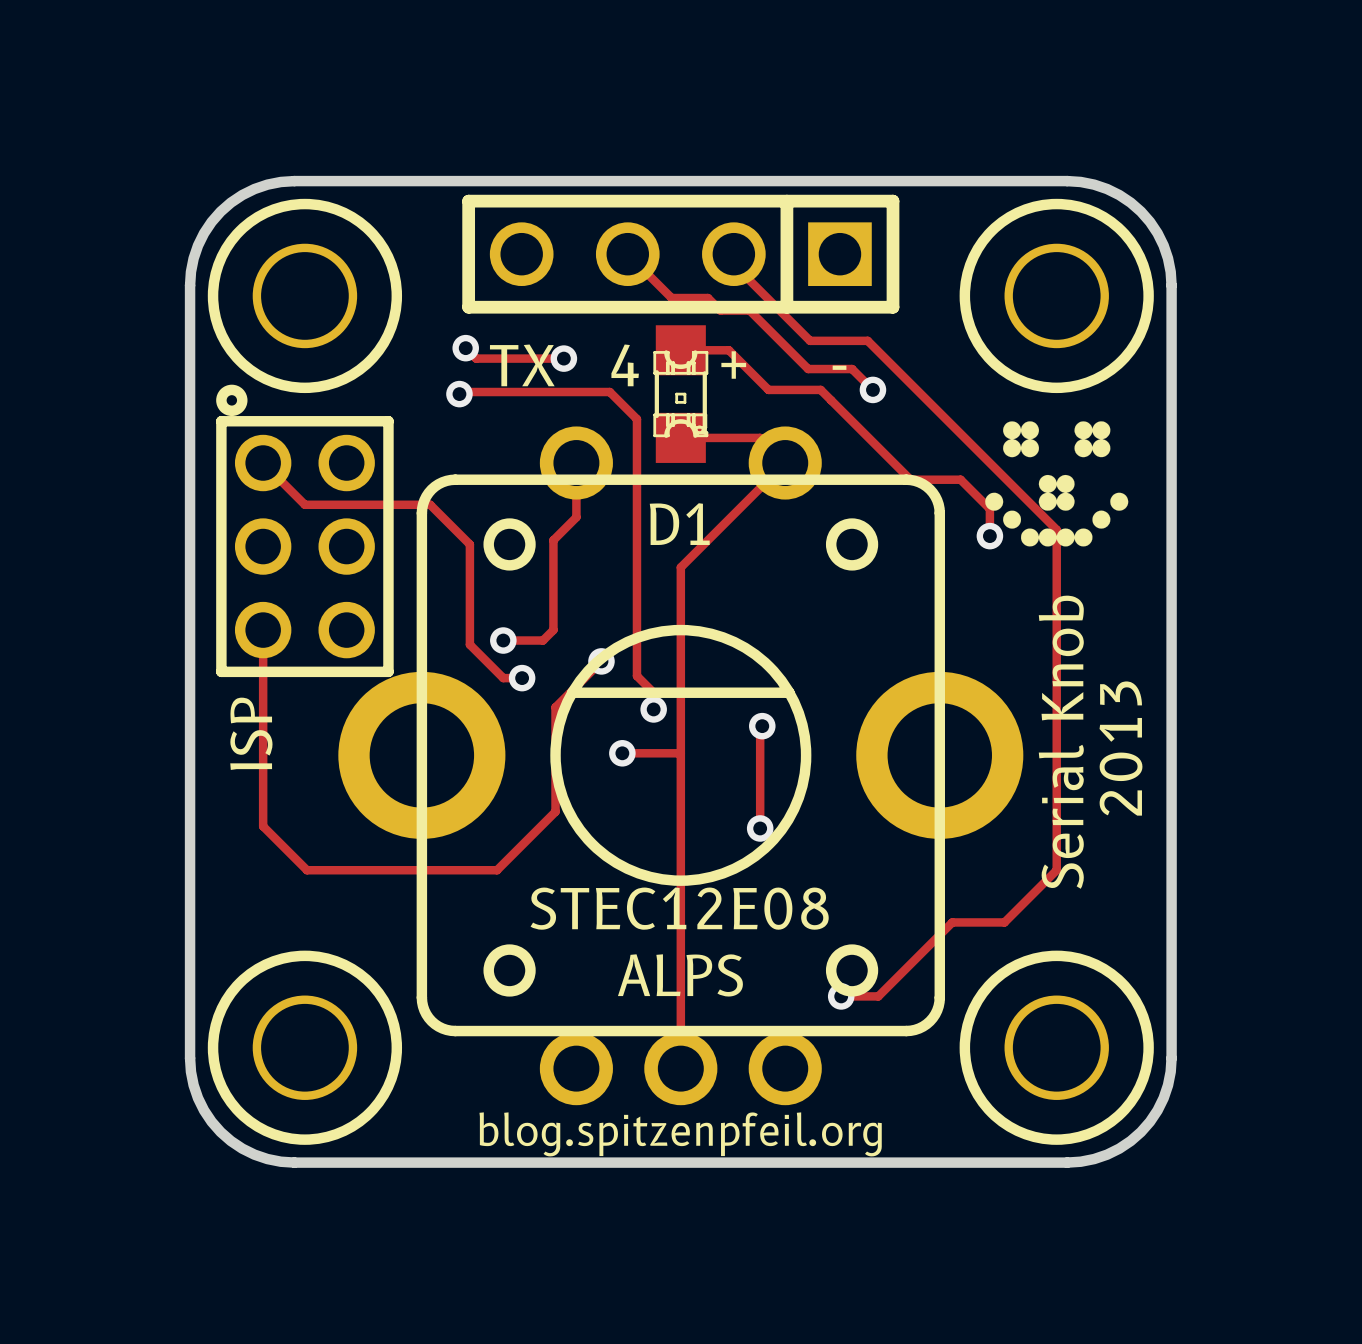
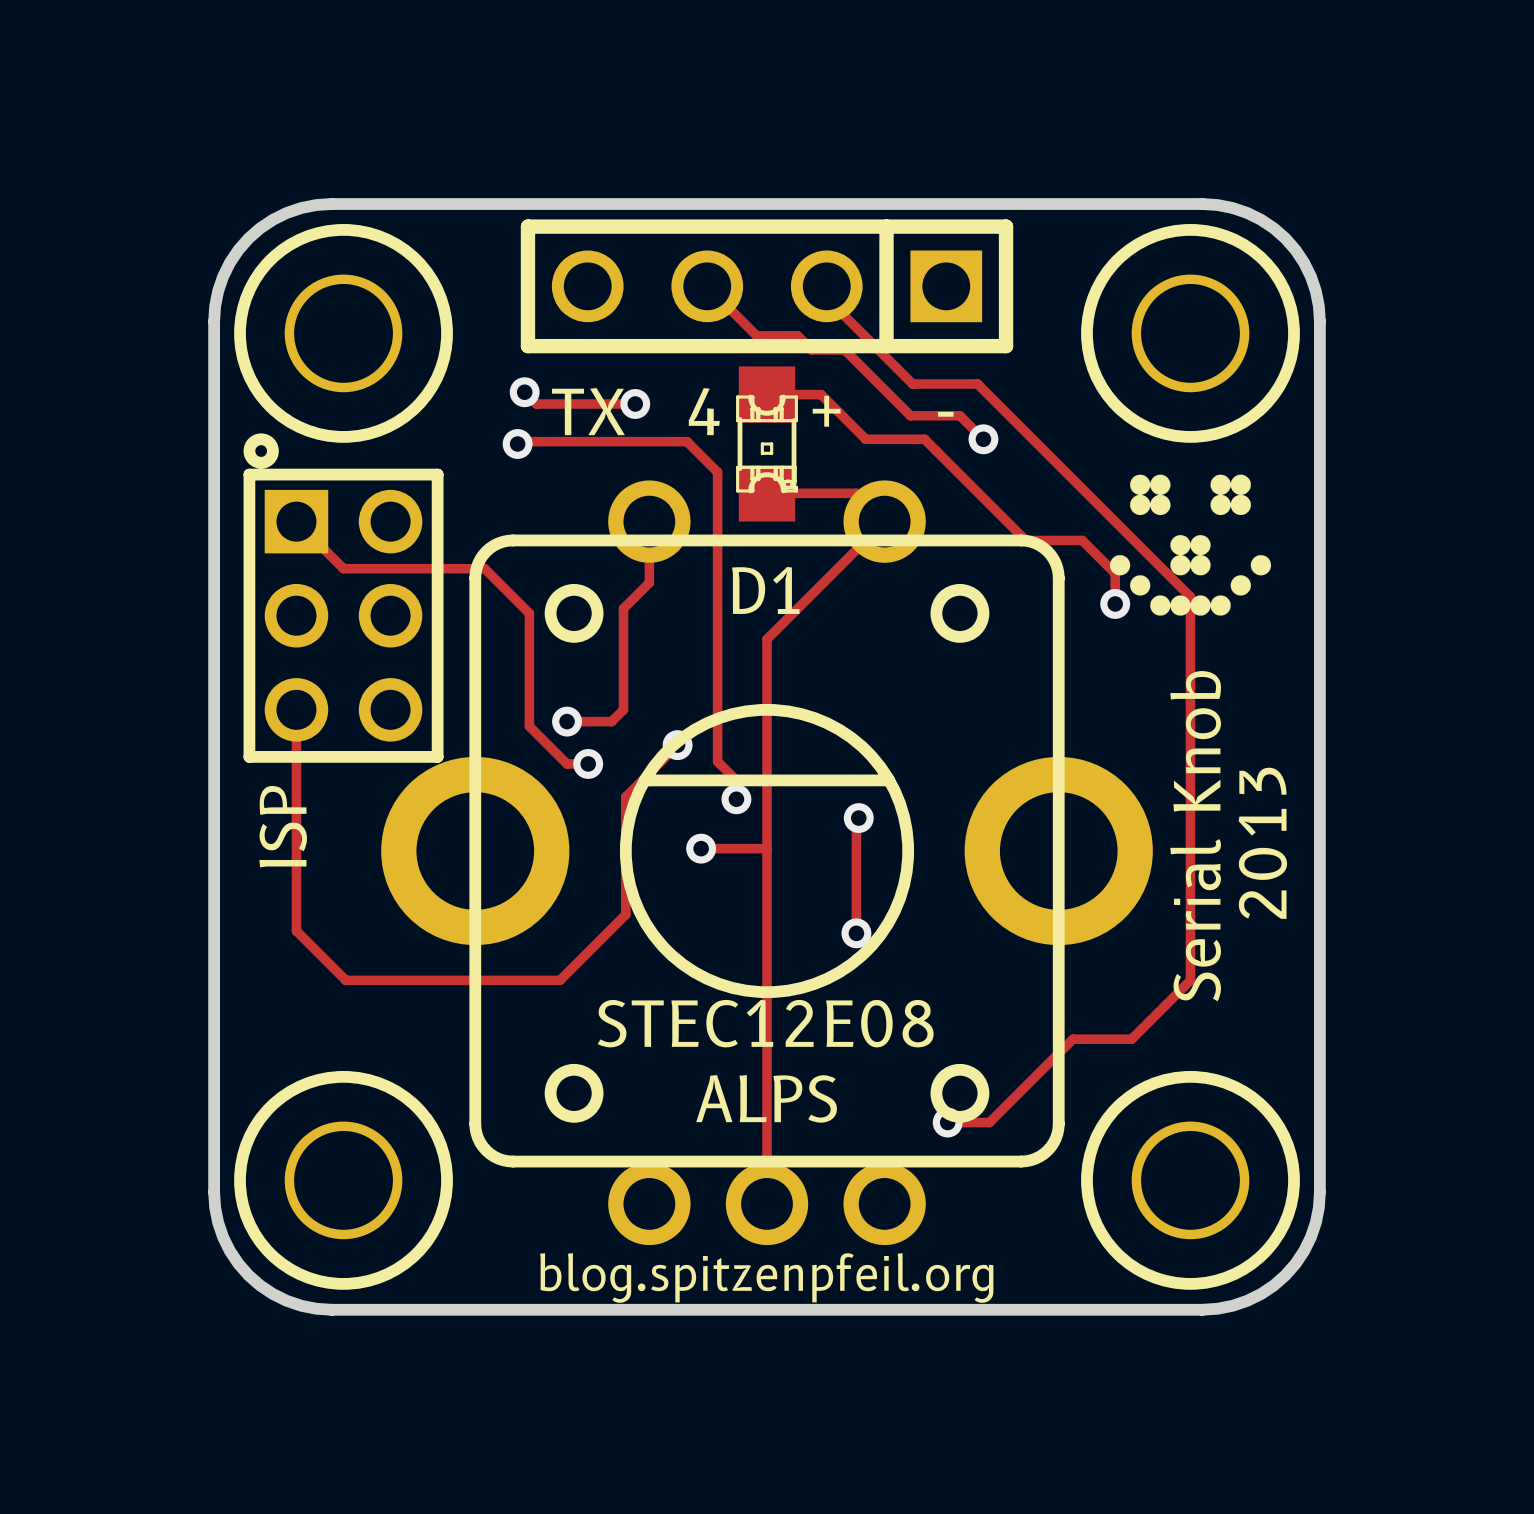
part footprint: [216, 384, 394, 678] -> [243, 433, 444, 763]

